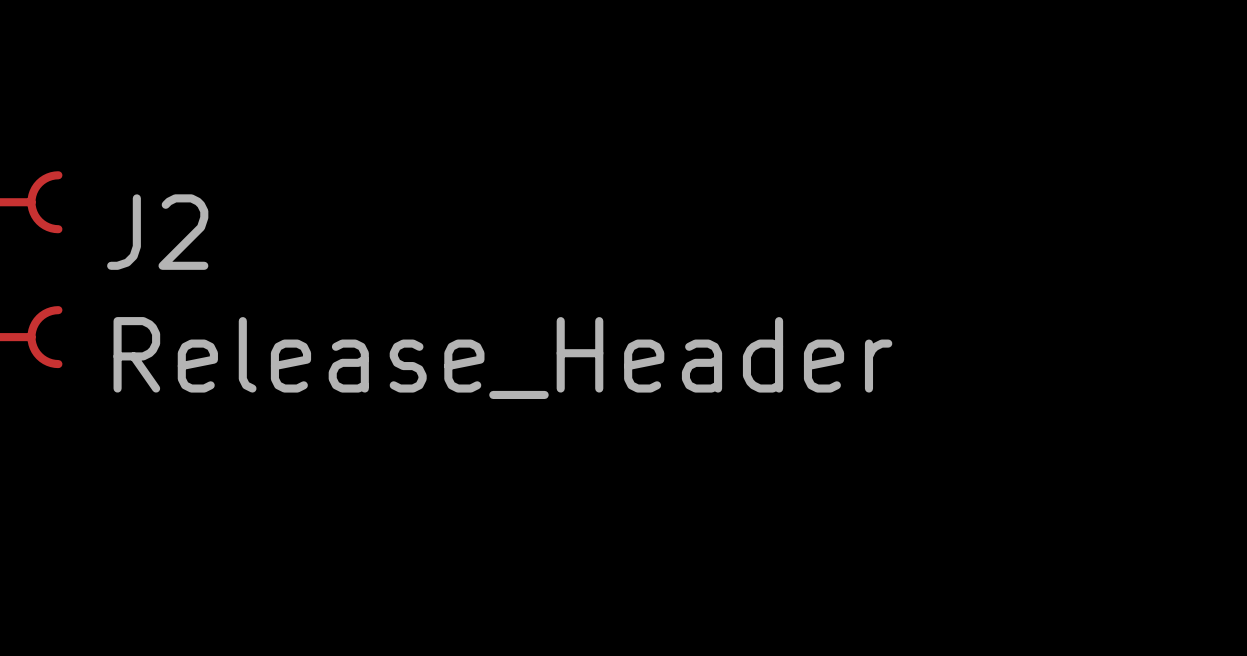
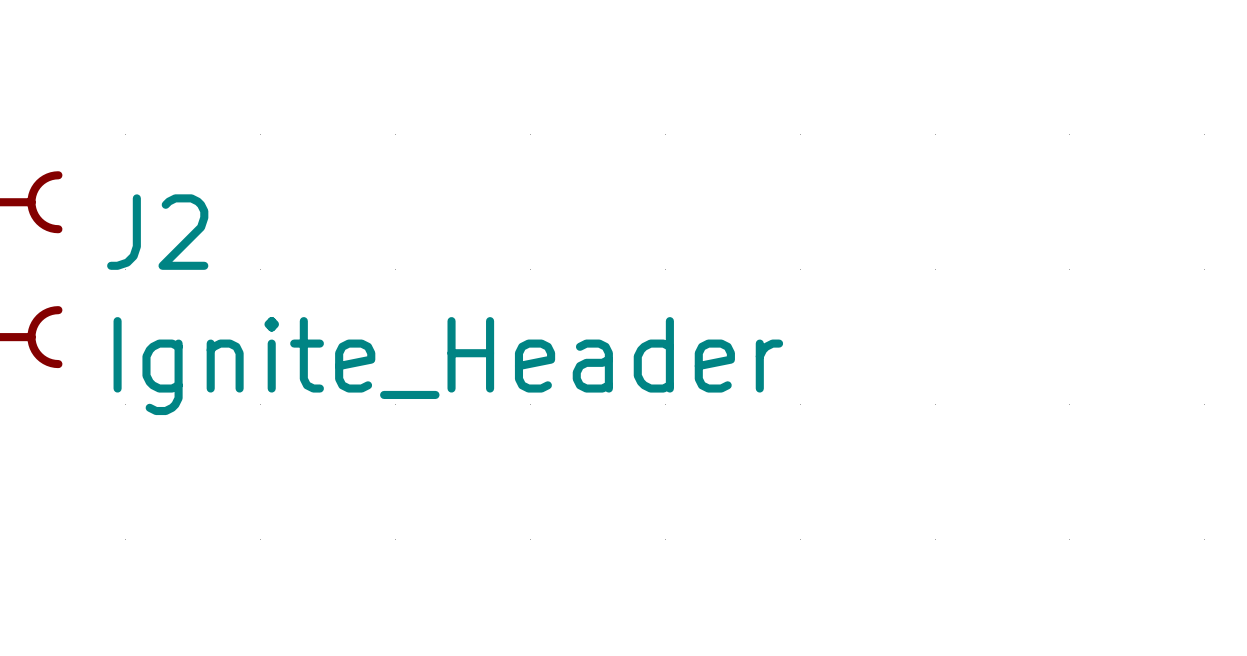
J2 value: Release_Header (502, 358) -> Ignite_Header (448, 366)

